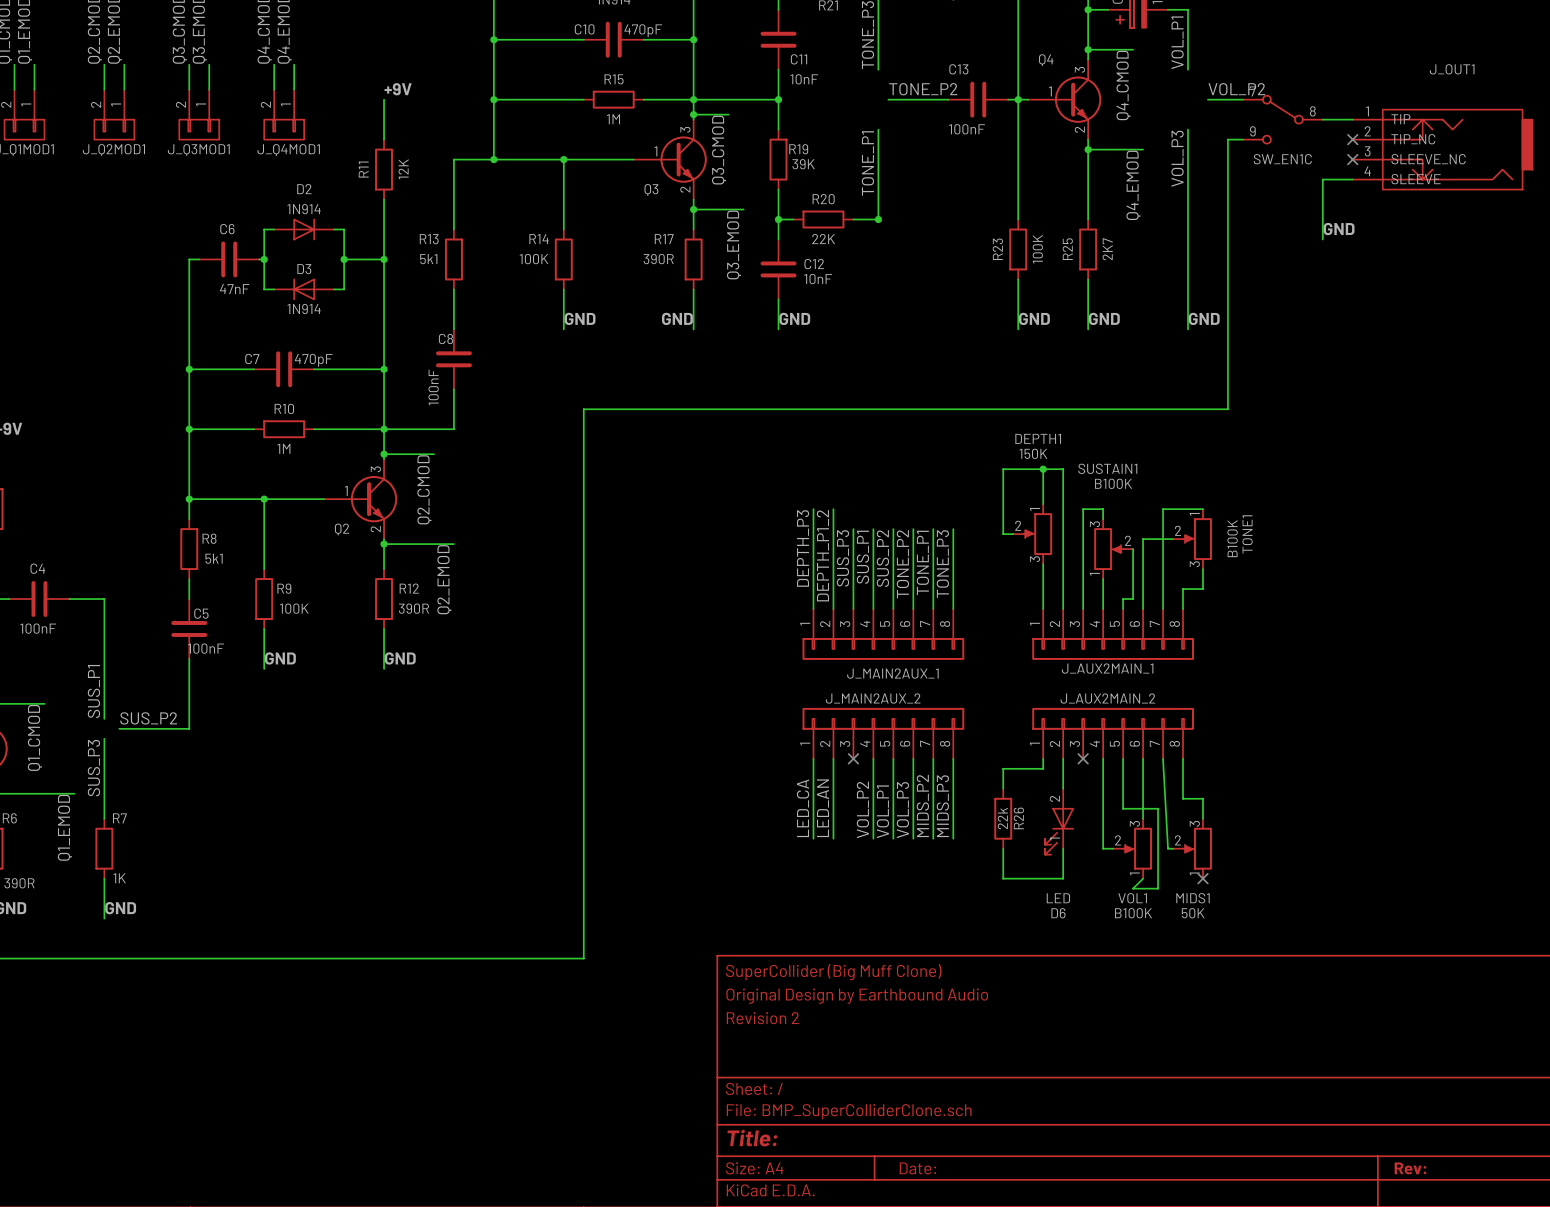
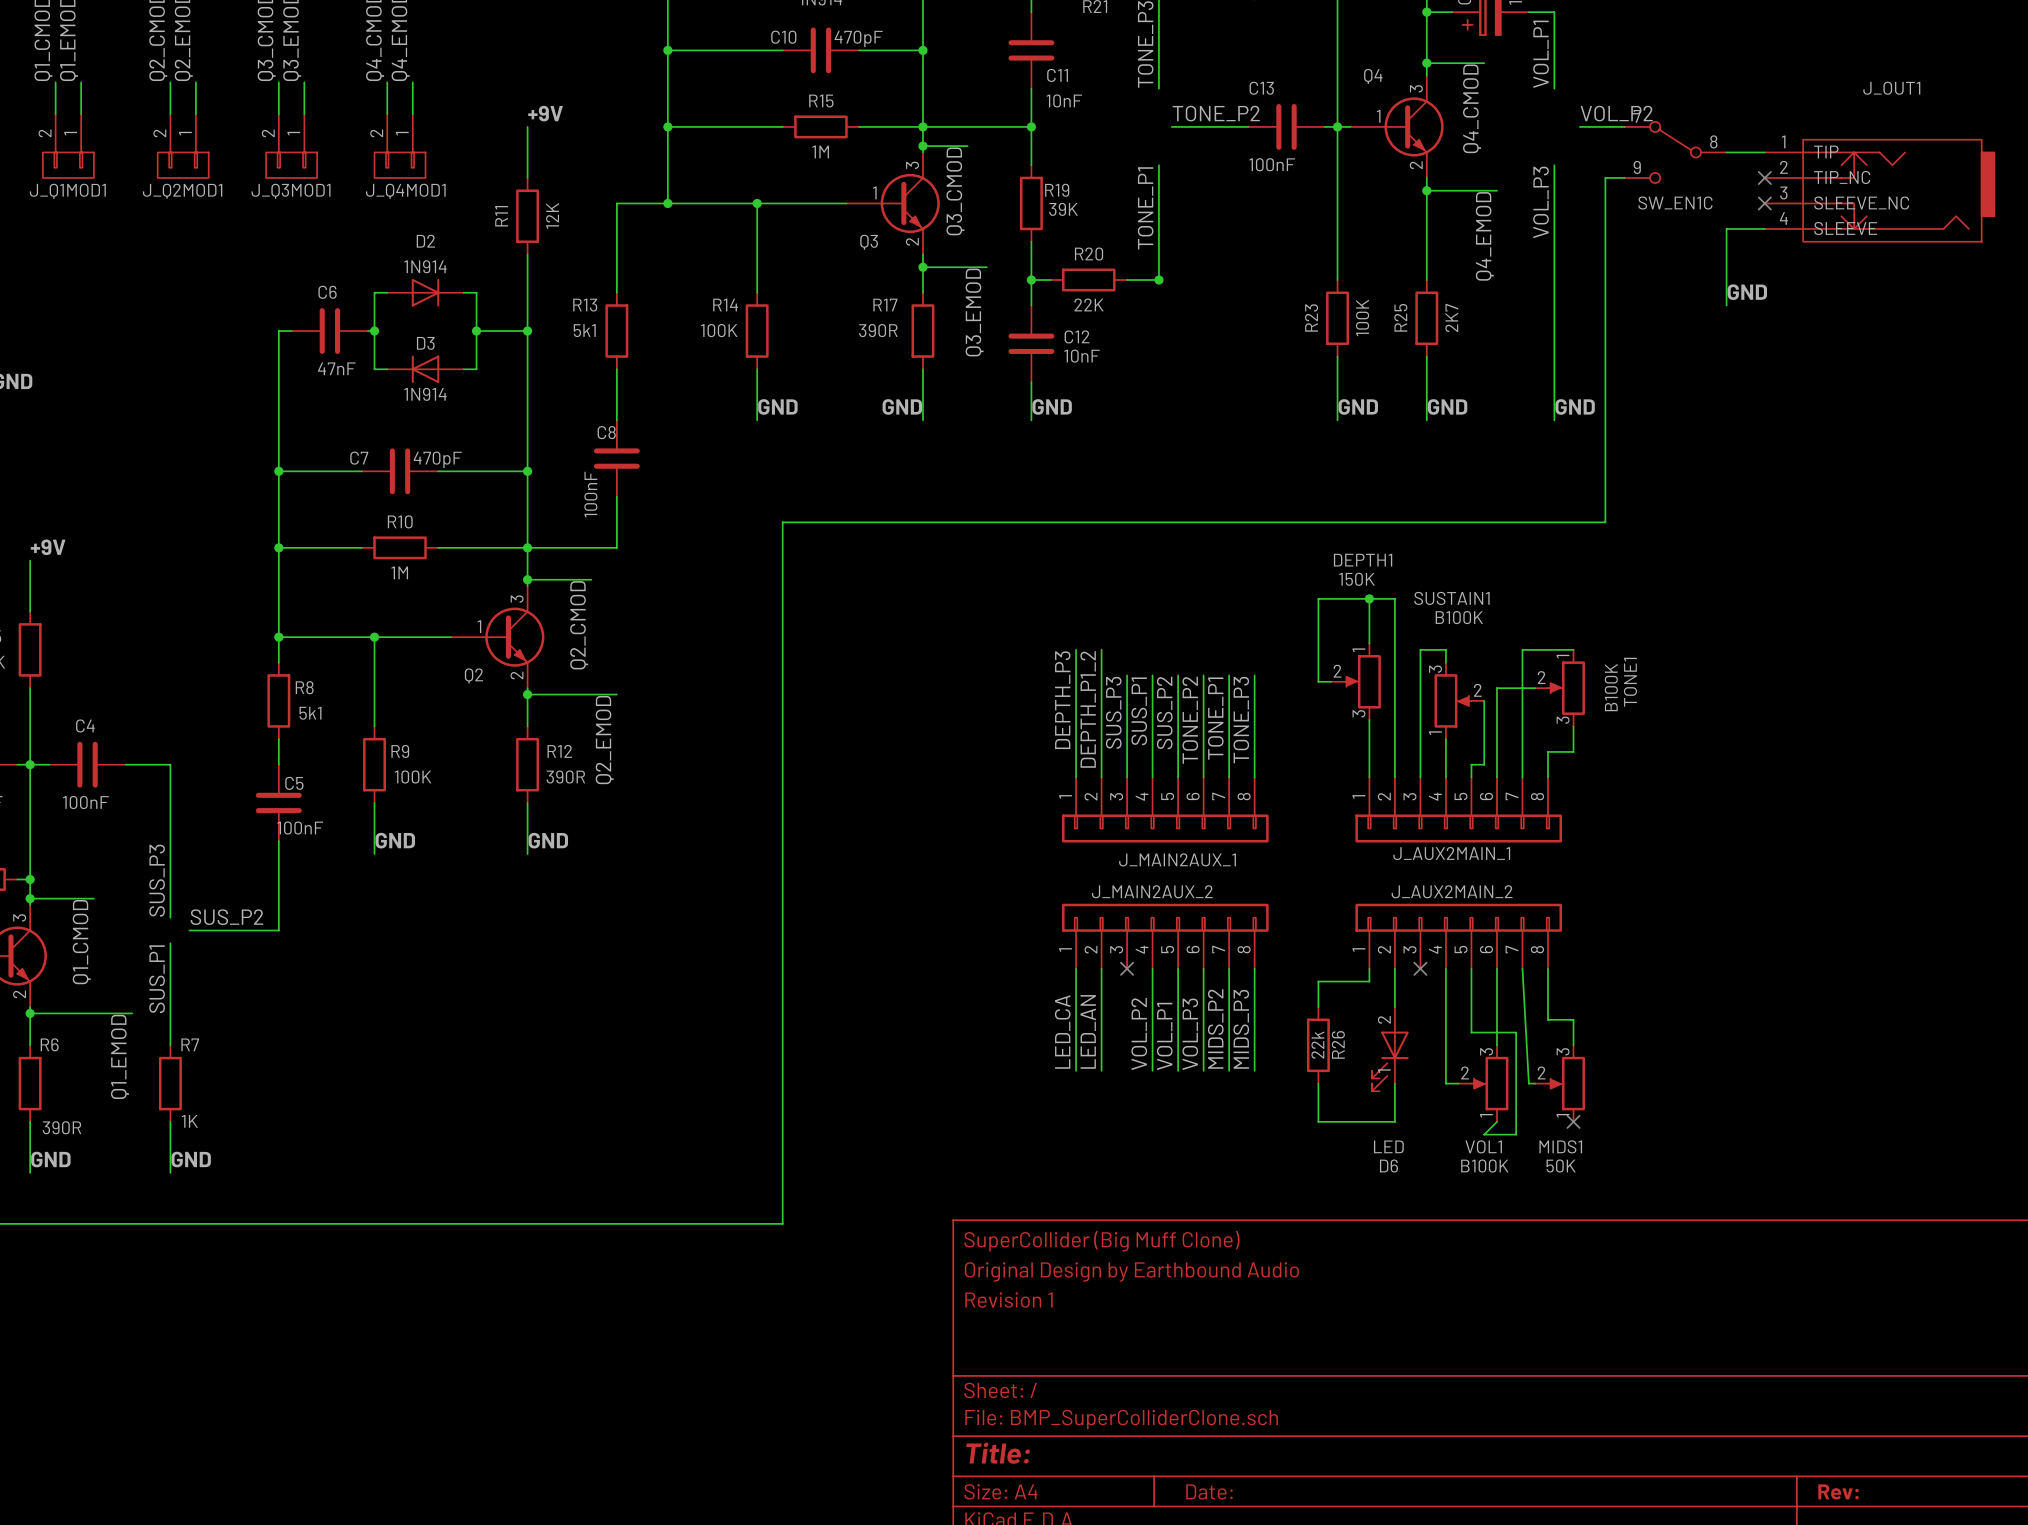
label: SUS_P1 (93, 691) -> SUS_P3 (157, 880)
label: SUS_P3 (93, 768) -> SUS_P1 (157, 979)
title block: Revision 2 (762, 1018) -> Revision 1 (1008, 1300)

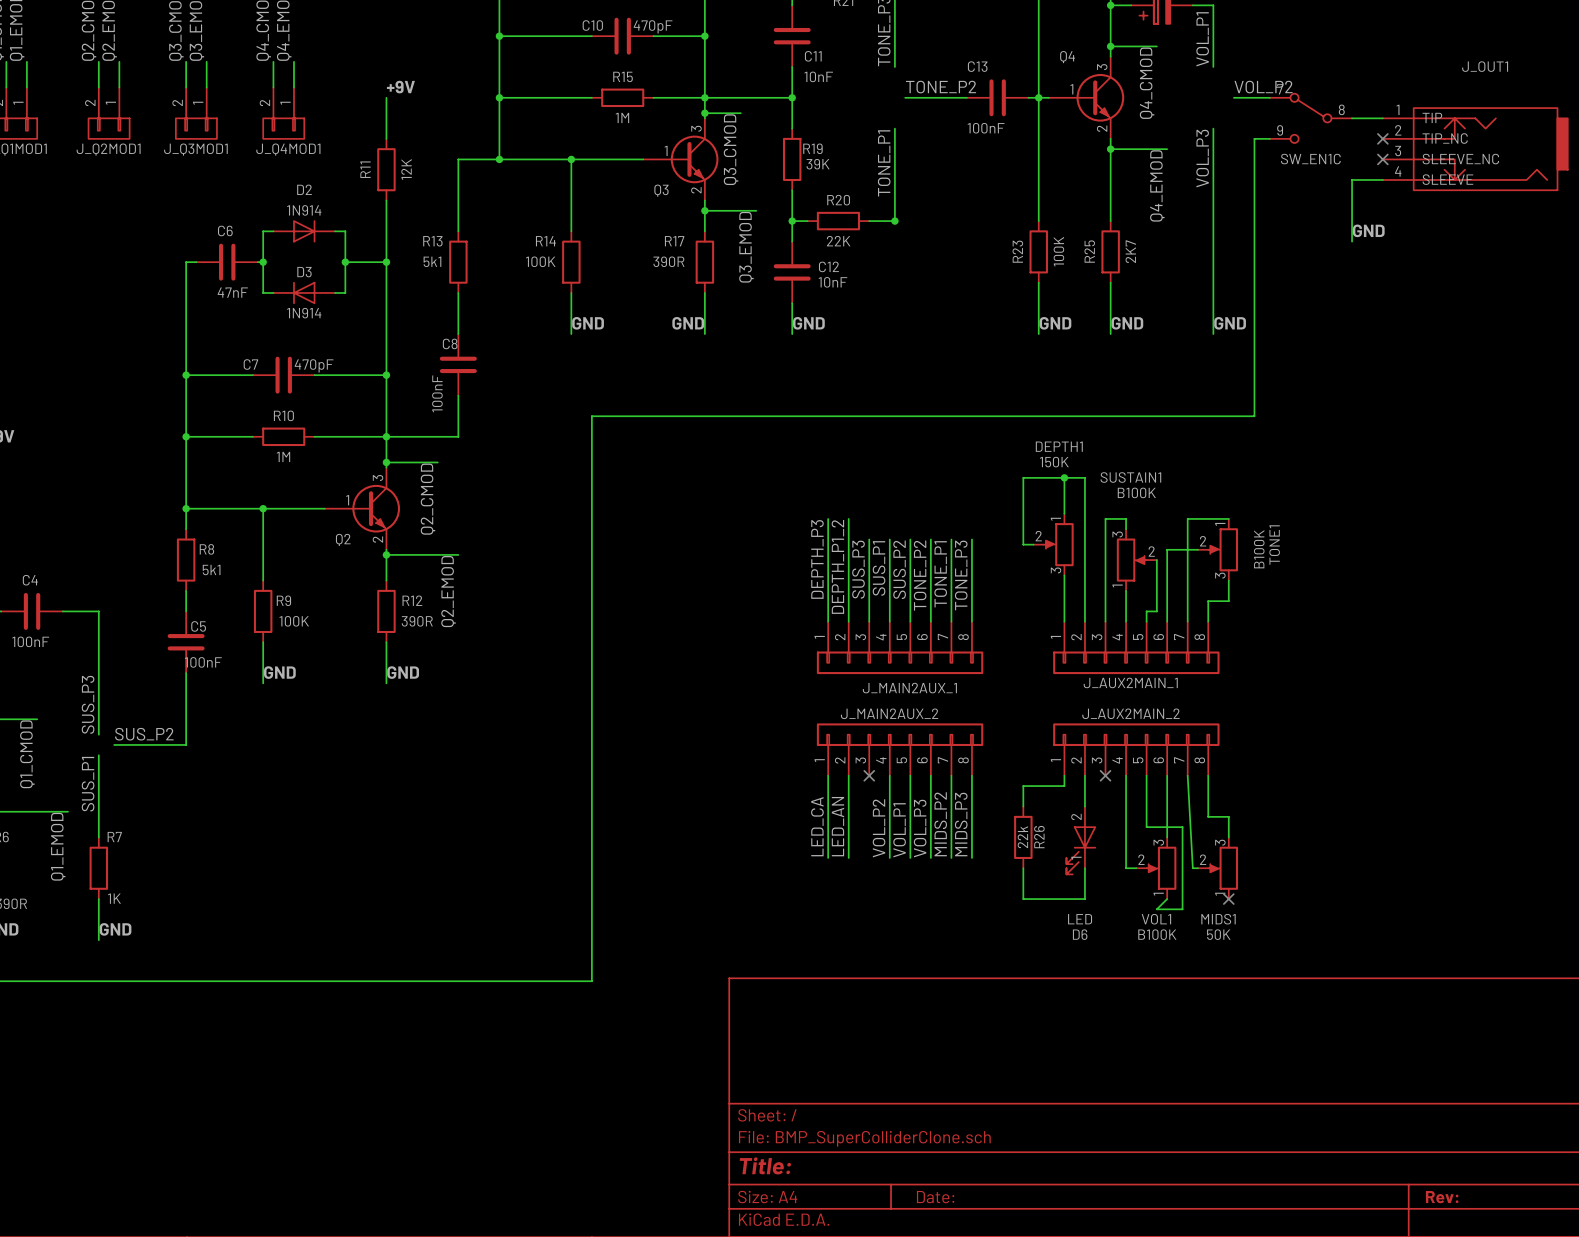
title block: SuperCollider (Big Muff Clone) (1102, 1241) -> none
title block: Original Design by Earthbound Audio (1131, 1271) -> none
title block: Revision 1 (1008, 1300) -> none

